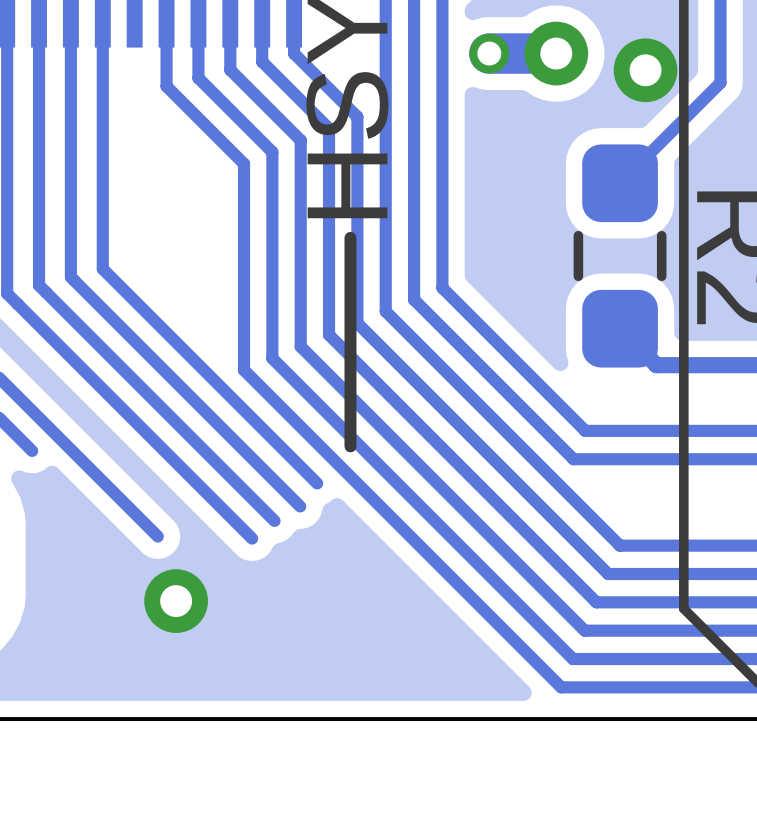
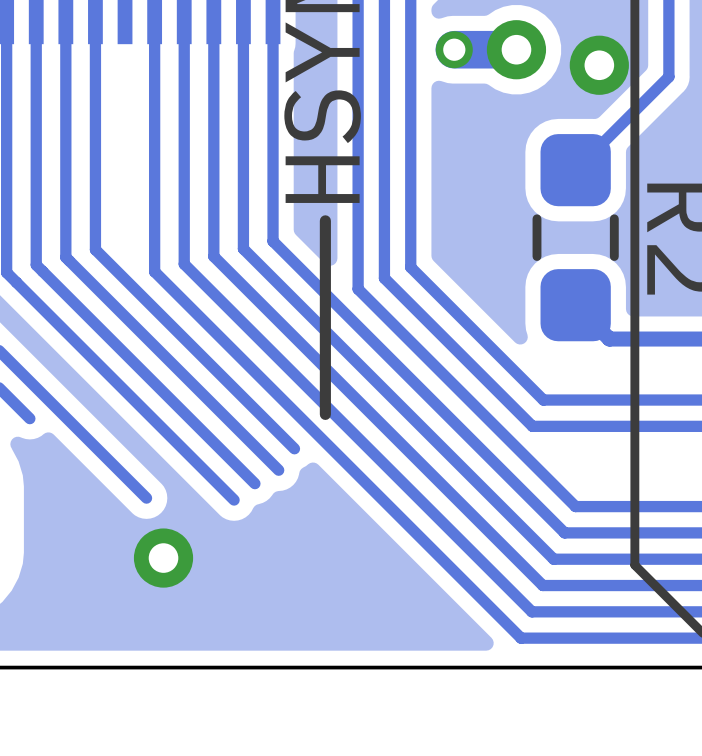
track: (294, 53) (357, 116) (357, 323) -> (273, 49) (273, 241) (331, 300)
track: (262, 61) (329, 128) (329, 334) -> (243, 57) (243, 248) (305, 310)
track: (230, 69) (300, 140) (300, 346) -> (213, 64) (213, 256) (279, 321)
track: (198, 78) (272, 152) (272, 358) -> (184, 72) (184, 264) (252, 332)
track: (166, 86) (244, 163) (244, 370) -> (154, 80) (154, 271) (226, 343)

